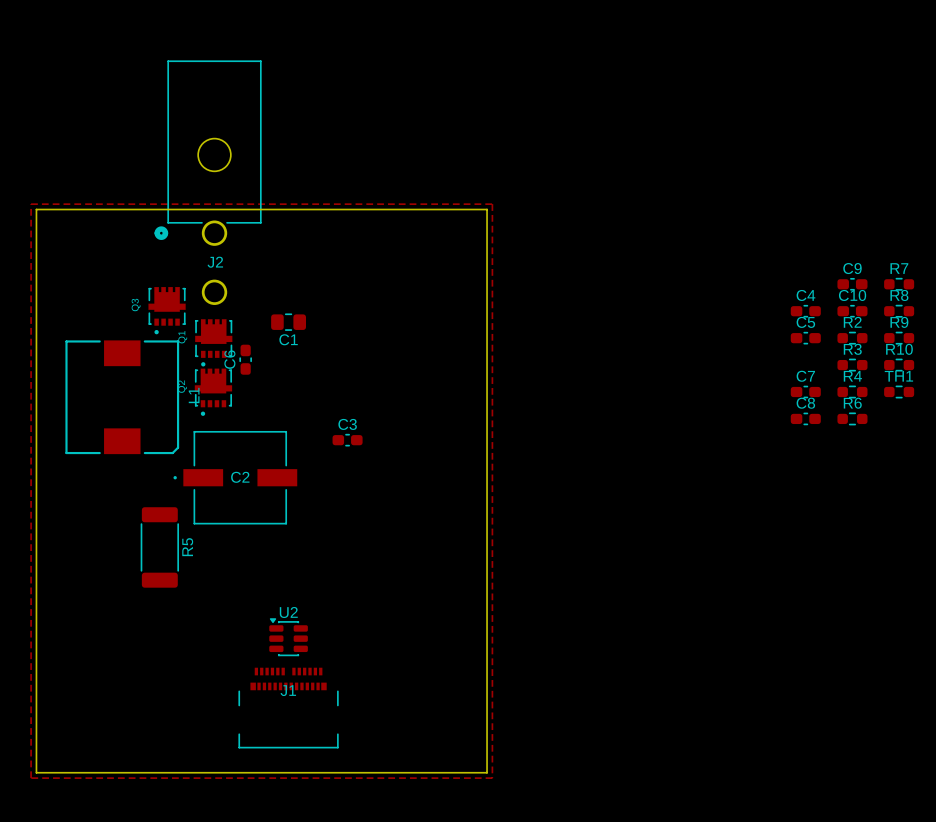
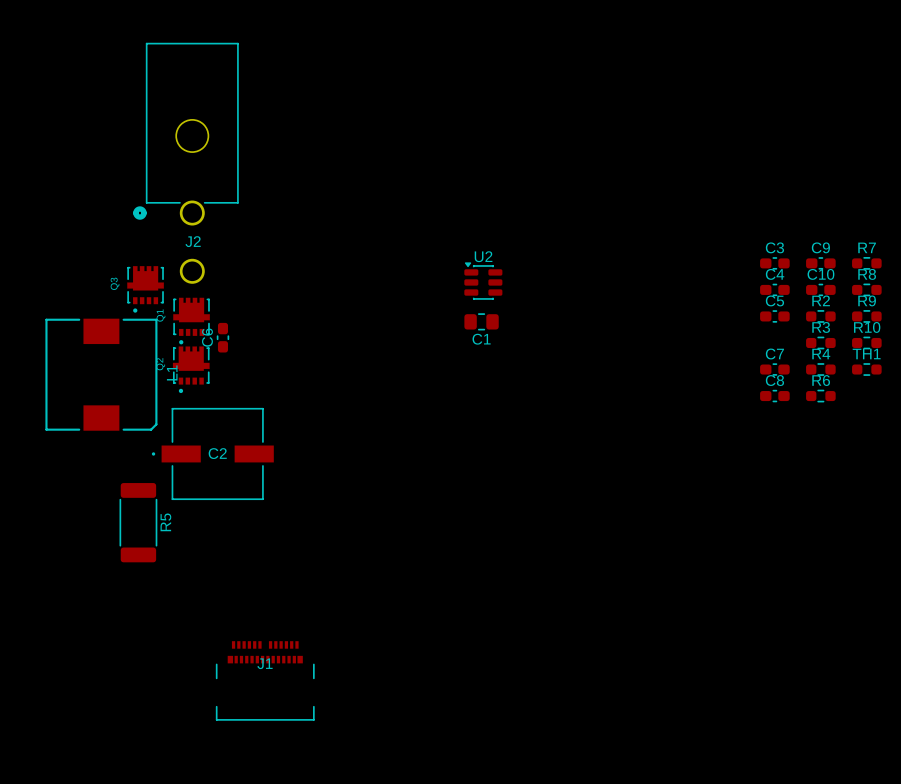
zone outline: (31, 204) (492, 204) (492, 778) (31, 778) (31, 204) -> none
board edge: (36, 209) (487, 209) (487, 772) (36, 772) (36, 209) -> none
C1 position: (288, 322) -> (481, 321)
C3 position: (347, 440) -> (774, 263)
U2 position: (288, 637) -> (483, 280)

